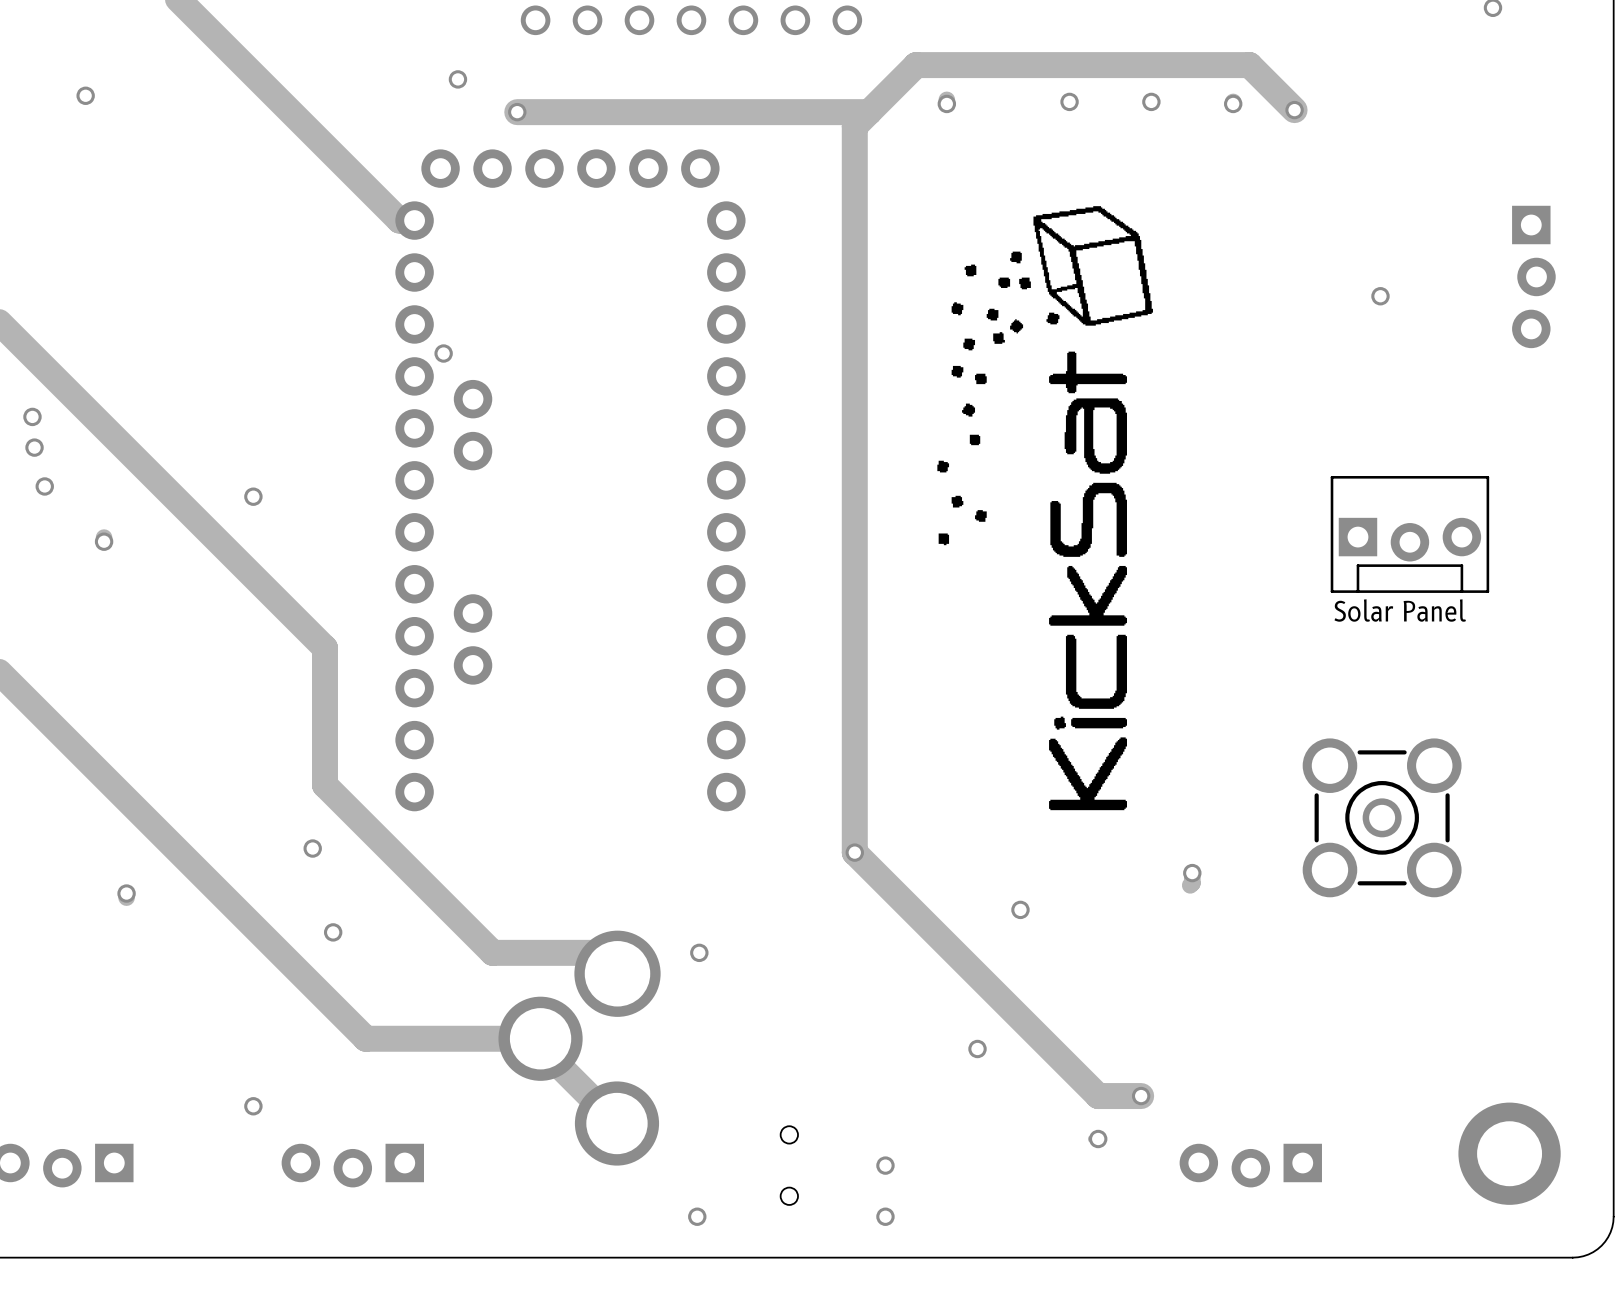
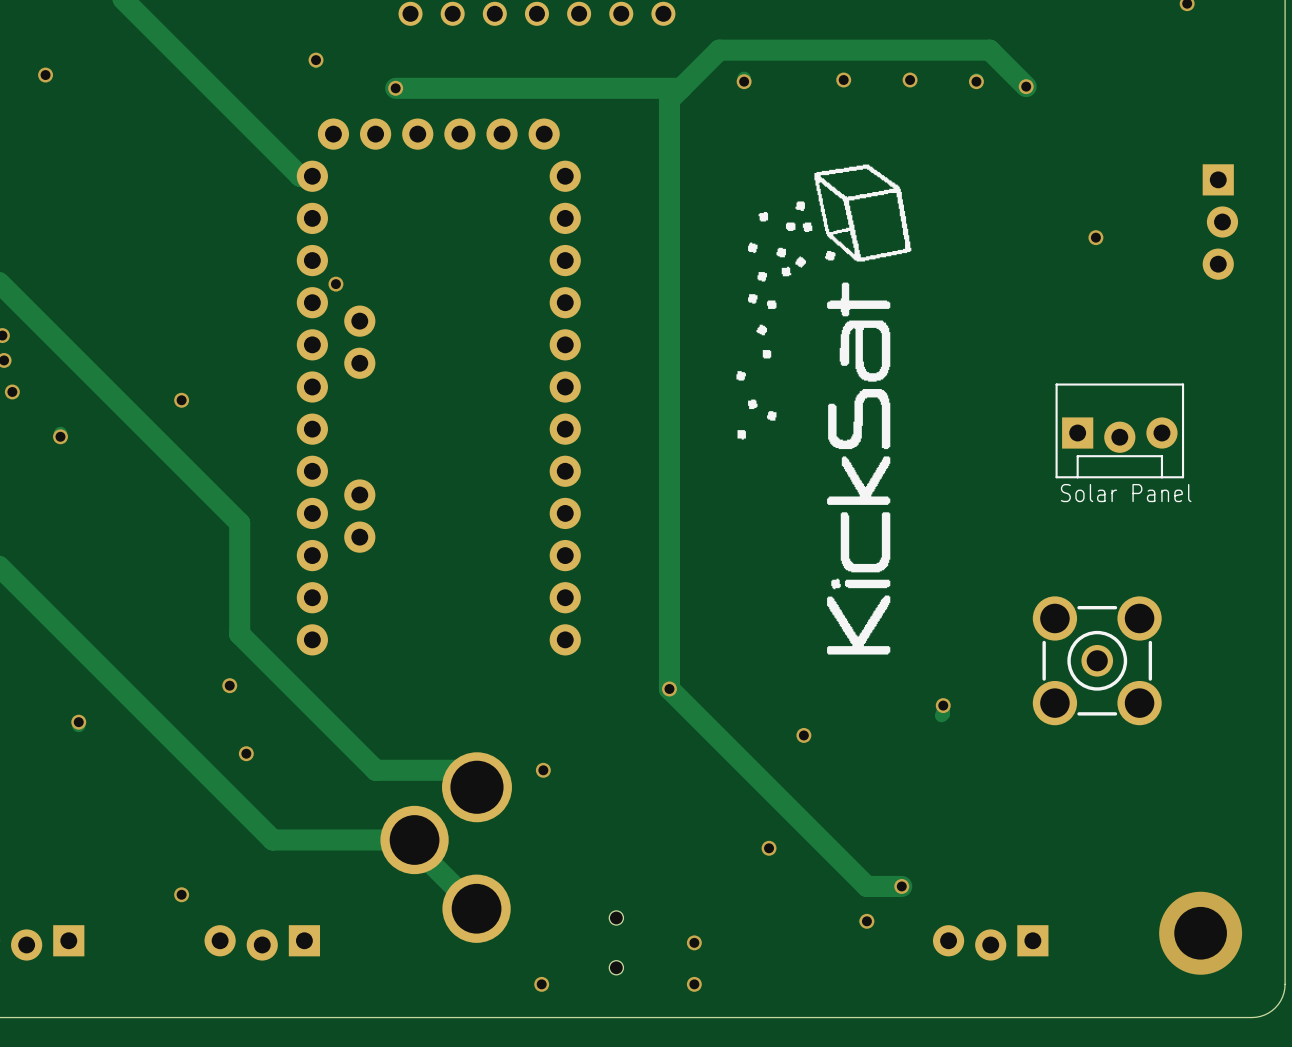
via position: (457, 79) -> (316, 60)

